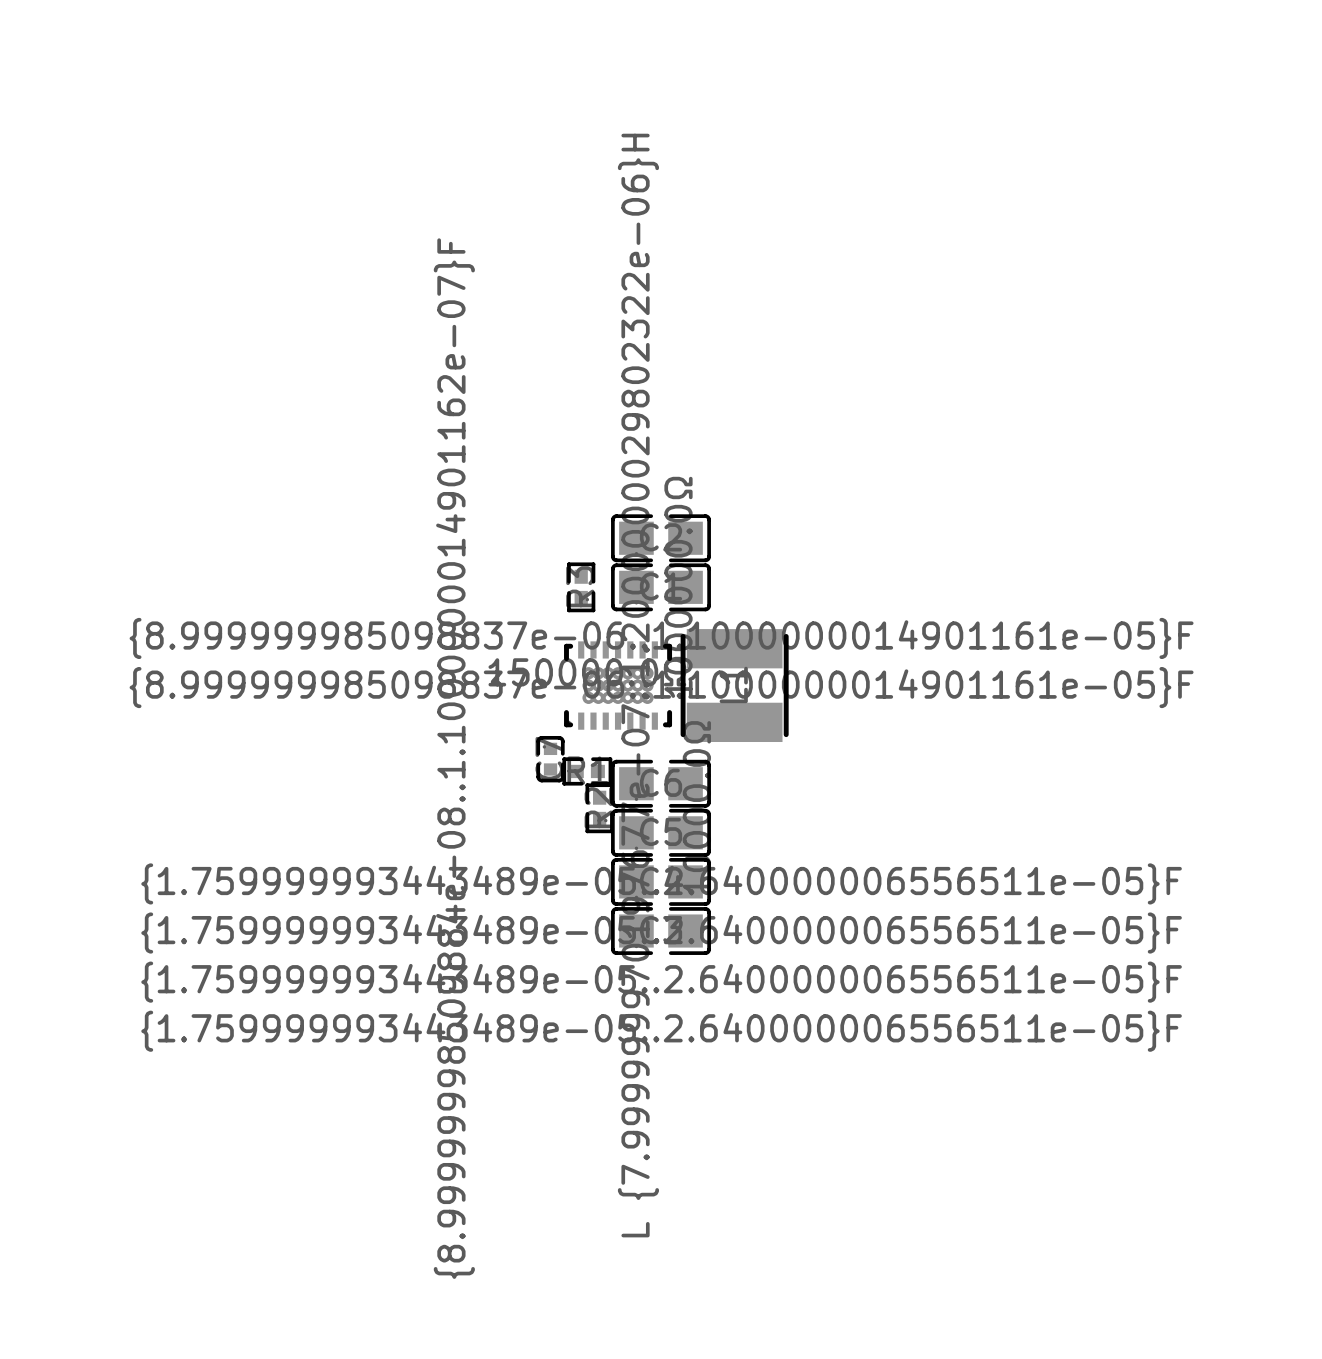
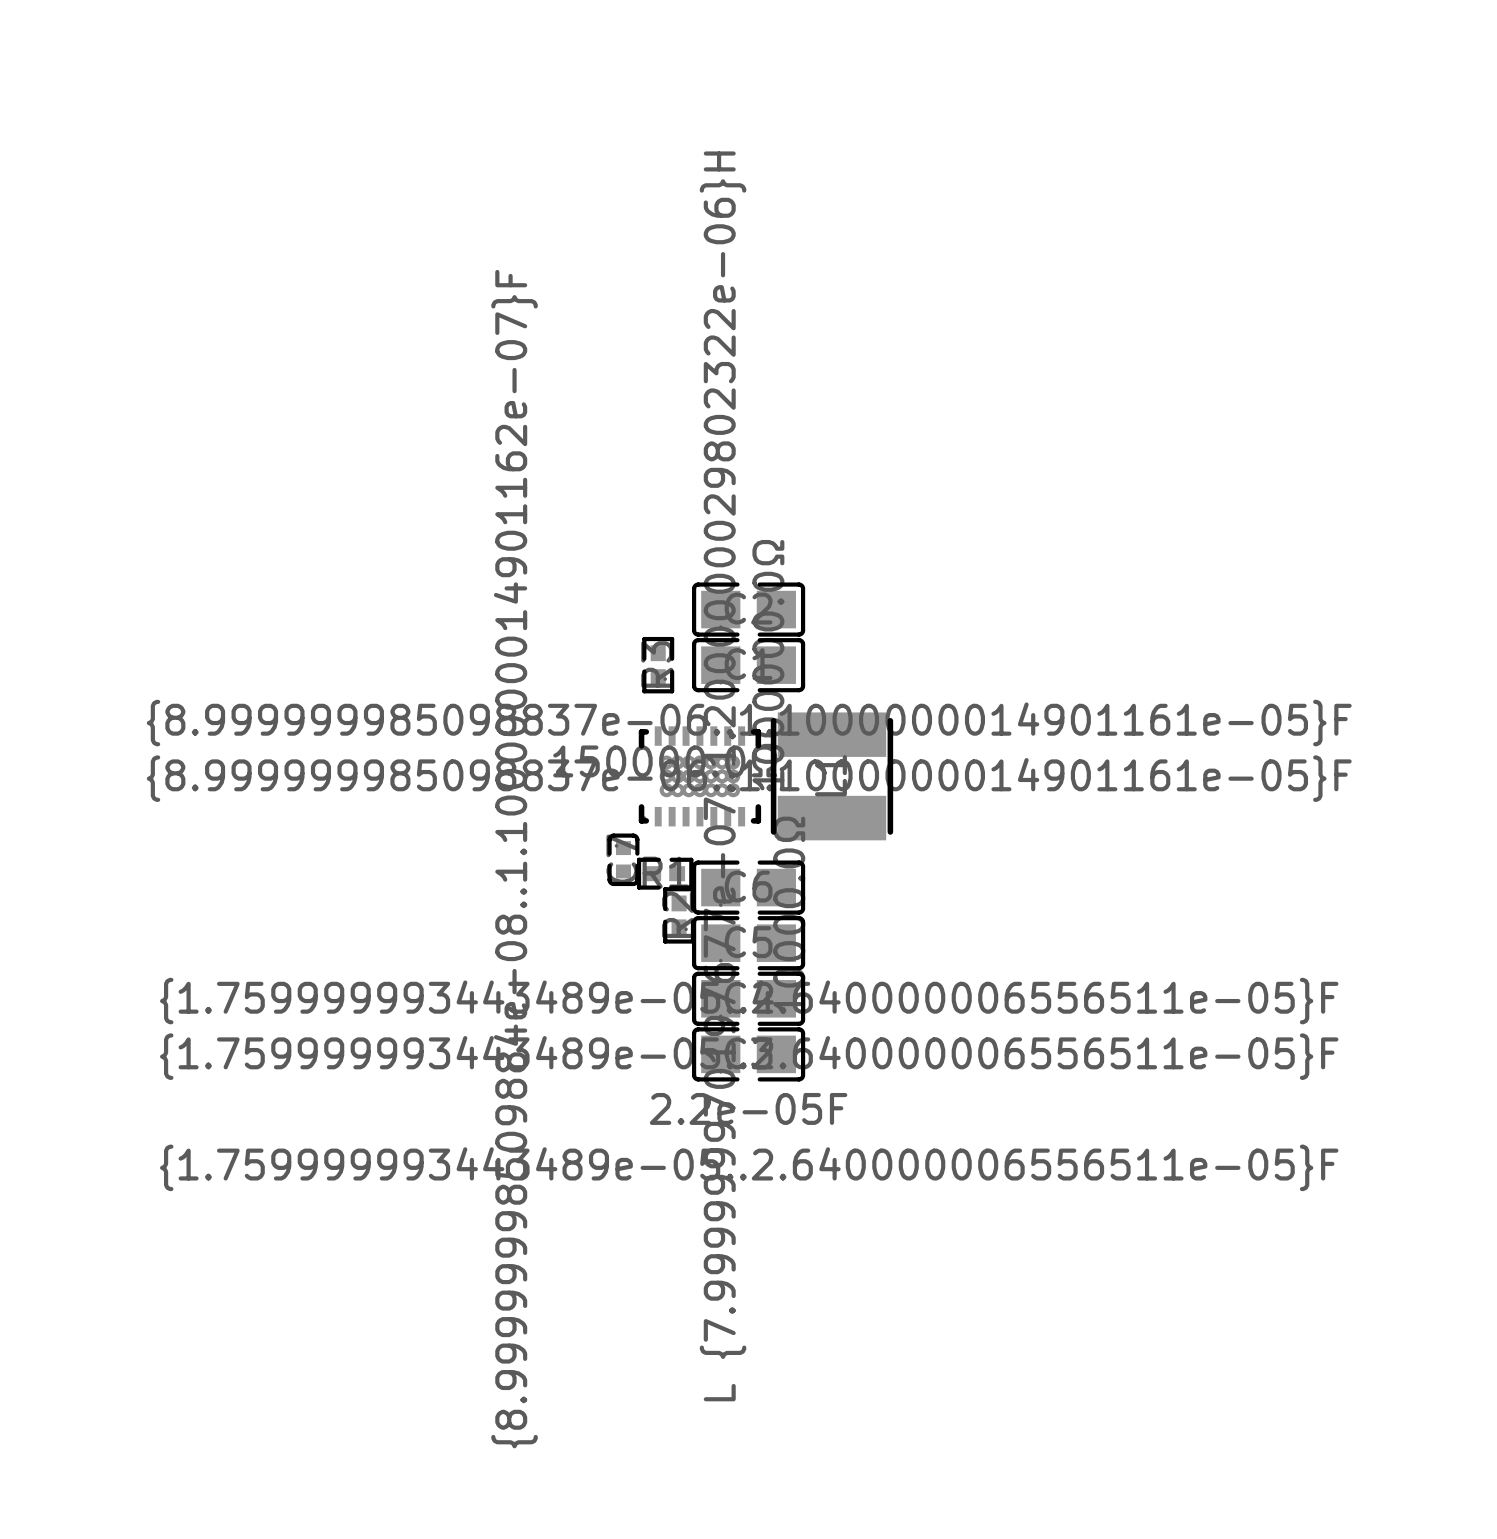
part value: {1.759999993443489e-05..2.640000006556511e-05}F (661, 982) -> 2.2e-05F (748, 1108)

